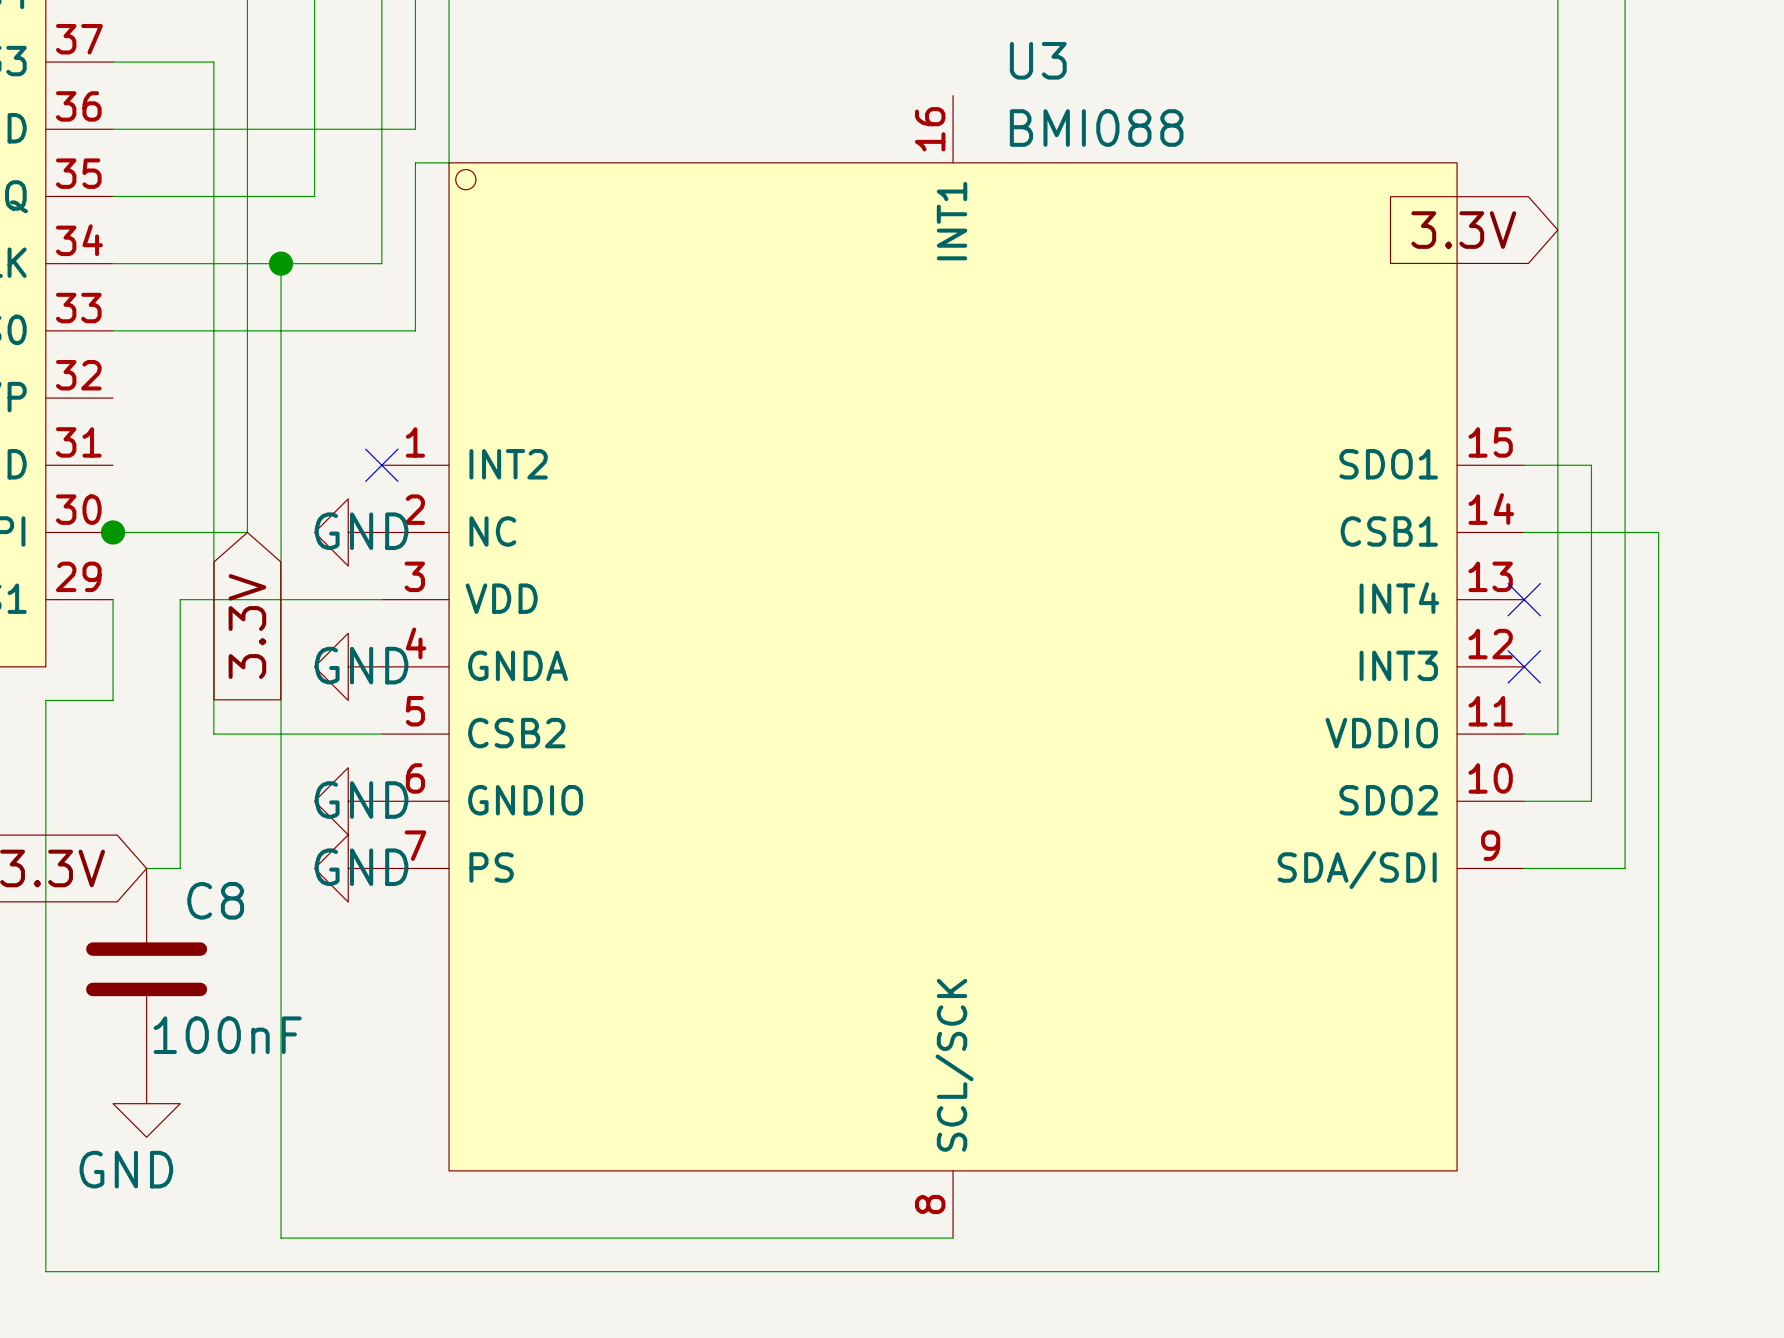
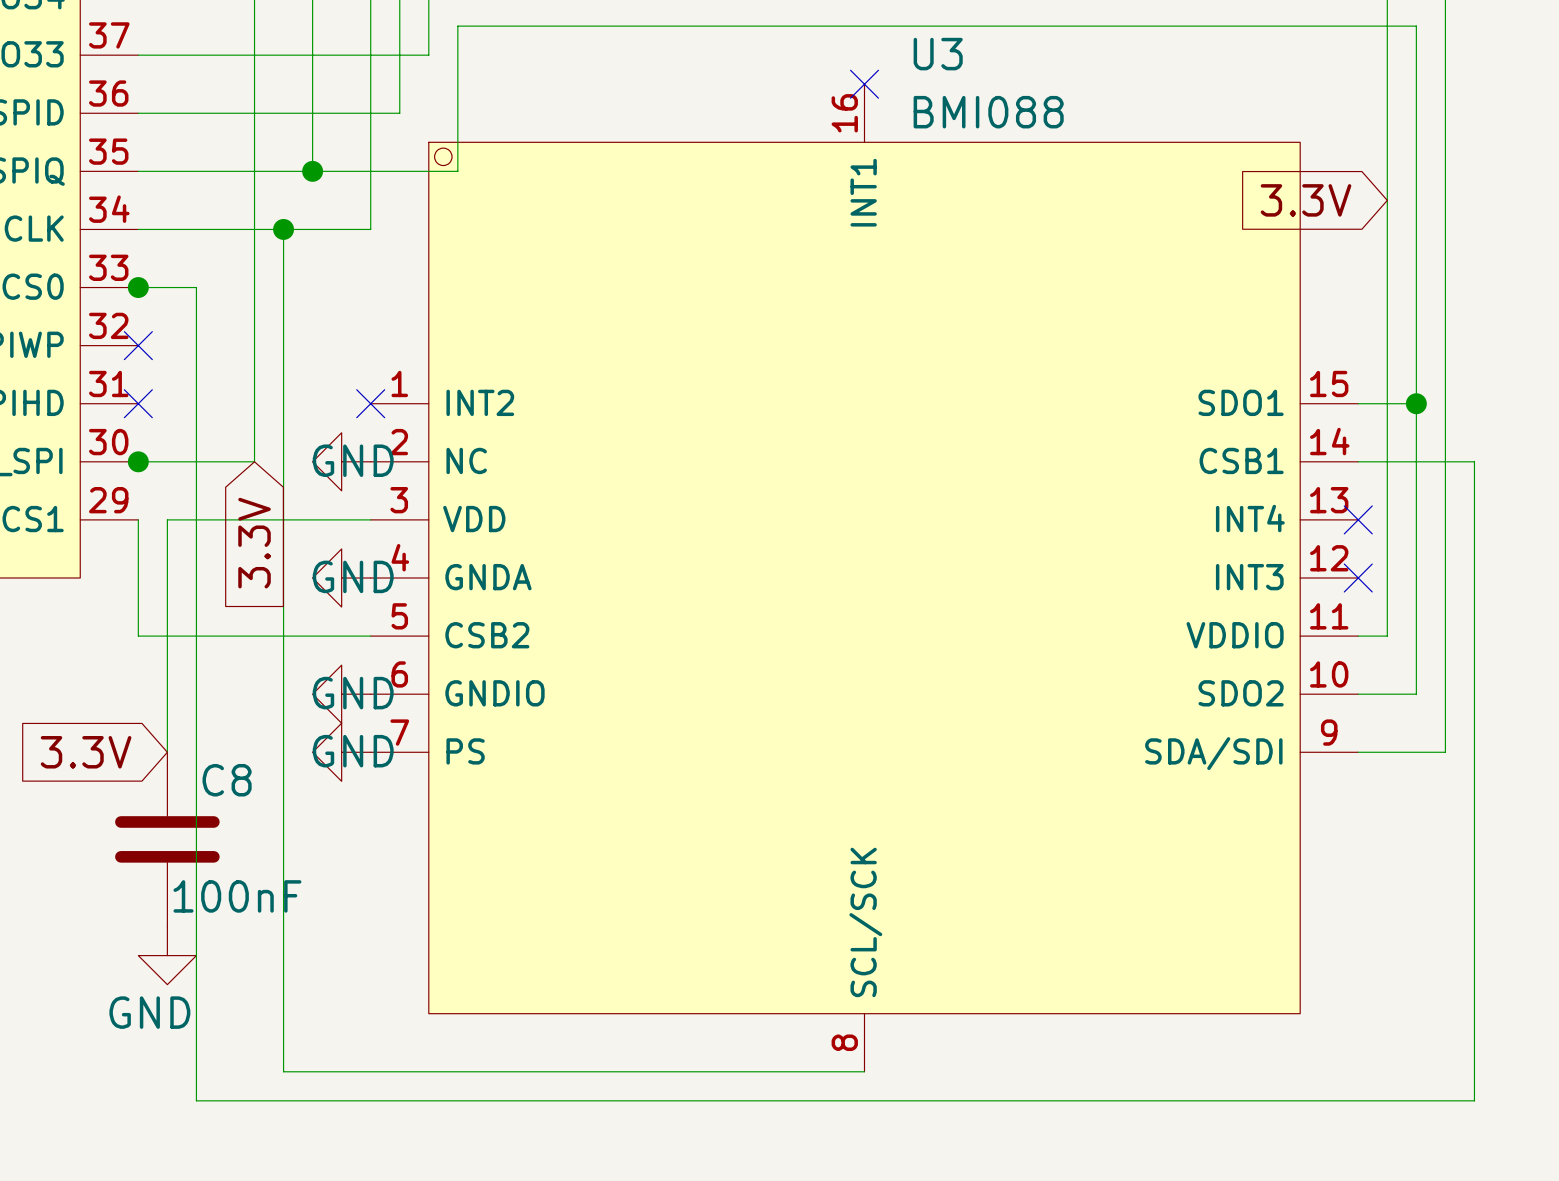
wire: (213, 62) (213, 734) -> (138, 607) (138, 636) (225, 636)
wire: (449, 62) (449, 162) (415, 162) (415, 330) (180, 330) -> (428, 55) (225, 55)
no-connect mark: none -> (864, 84)
wire: none -> (312, 171) (457, 171) (457, 26) (1416, 26) (1416, 403)
junction: none -> (312, 171)
junction: none -> (138, 287)
no-connect mark: none -> (138, 345)
no-connect mark: none -> (138, 403)
junction: none -> (1416, 403)
wire: (113, 700) (45, 700) (45, 1271) (180, 1271) -> (196, 752) (196, 1100)
wire: (146, 868) (180, 868) -> (167, 752) (167, 519) (196, 519) (196, 287)

